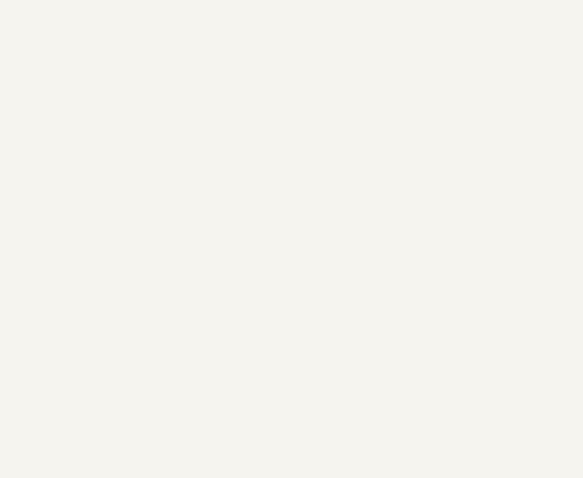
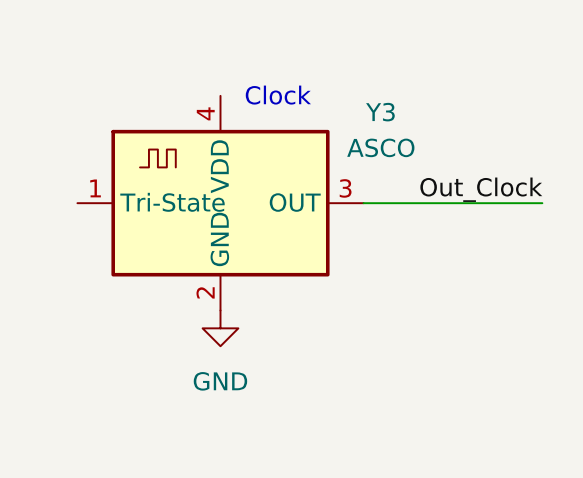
text: none -> Clock (278, 95)
label: none -> Out_Clock (481, 189)
Y3: none -> ASCO (220, 203)
wire: none -> (363, 203) (542, 203)
power symbol: none -> GND (220, 328)

